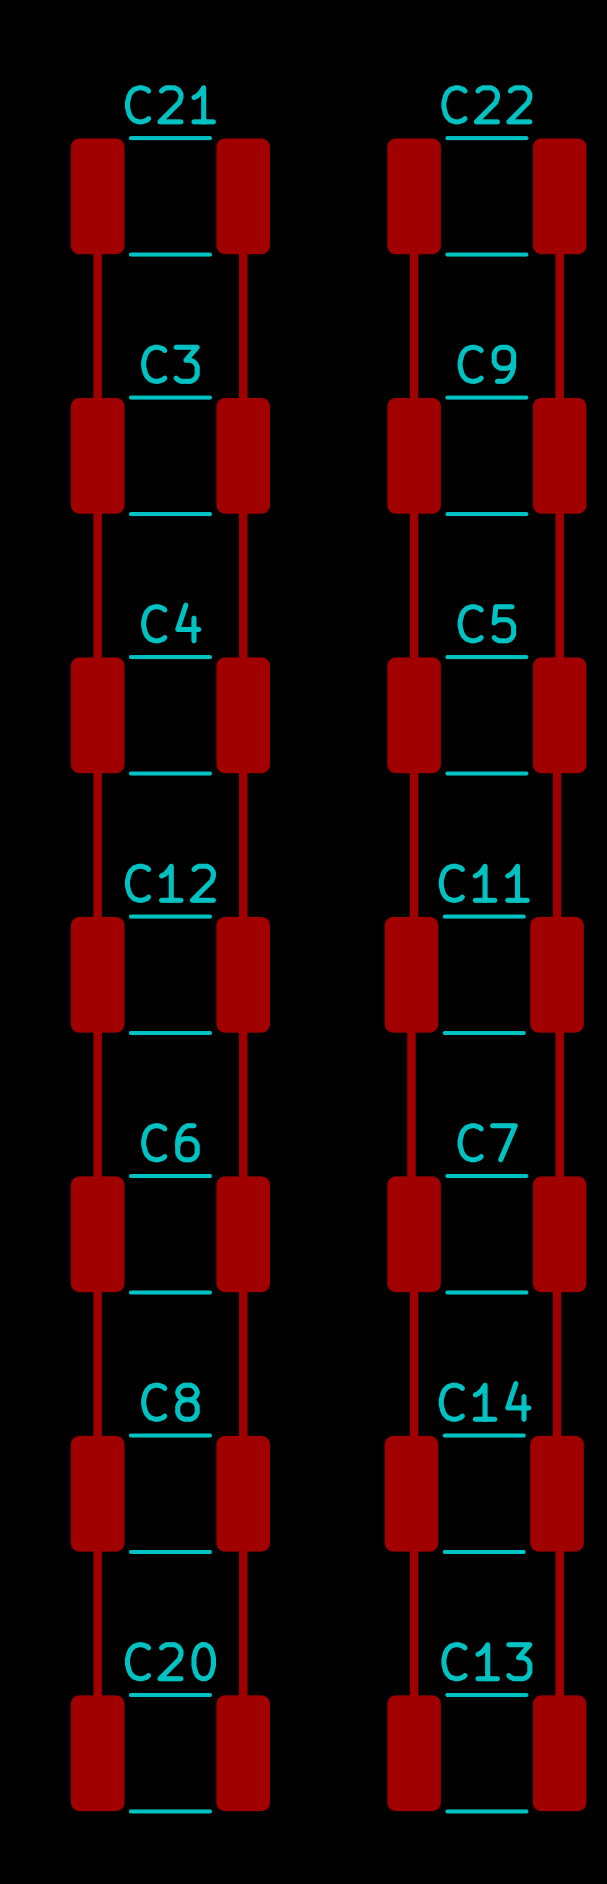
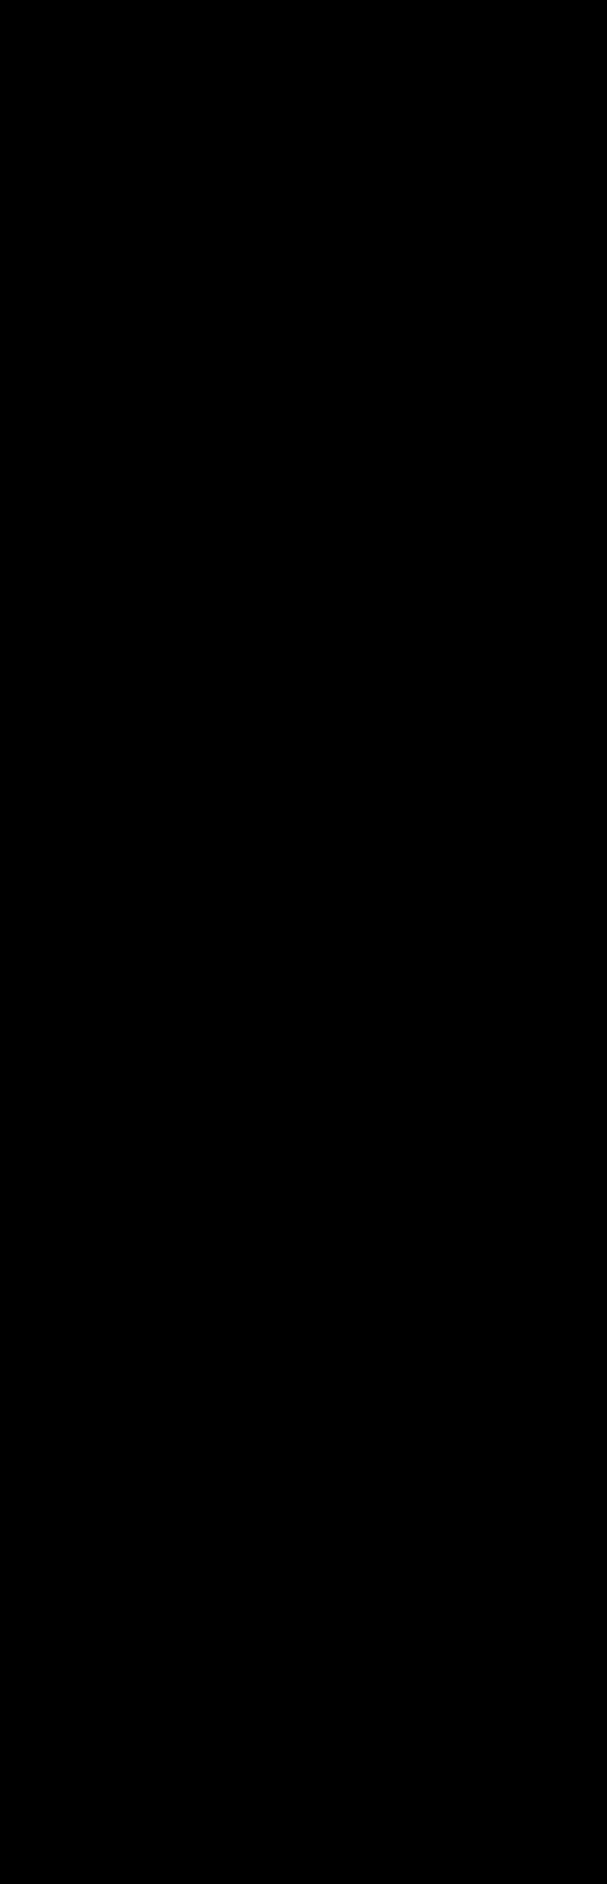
track: (97, 196) (97, 1753) -> none
C21: (170, 196) -> none
track: (243, 196) (243, 1753) -> none
track: (414, 196) (414, 972) (411, 974) (411, 1231) (414, 1234) (414, 1491) (411, 1493) (414, 1496) (414, 1753) -> none
C22: (486, 196) -> none
track: (559, 196) (559, 715) (557, 717) (557, 974) -> none
C3: (170, 455) -> none
C9: (486, 455) -> none
C4: (170, 715) -> none
C5: (486, 715) -> none
track: (557, 931) (559, 934) (559, 1234) (557, 1236) (559, 1753) -> none
C12: (170, 974) -> none
C11: (484, 974) -> none
C6: (170, 1234) -> none
C7: (486, 1234) -> none
C8: (170, 1493) -> none
C14: (484, 1493) -> none
C20: (170, 1753) -> none
C13: (486, 1753) -> none

